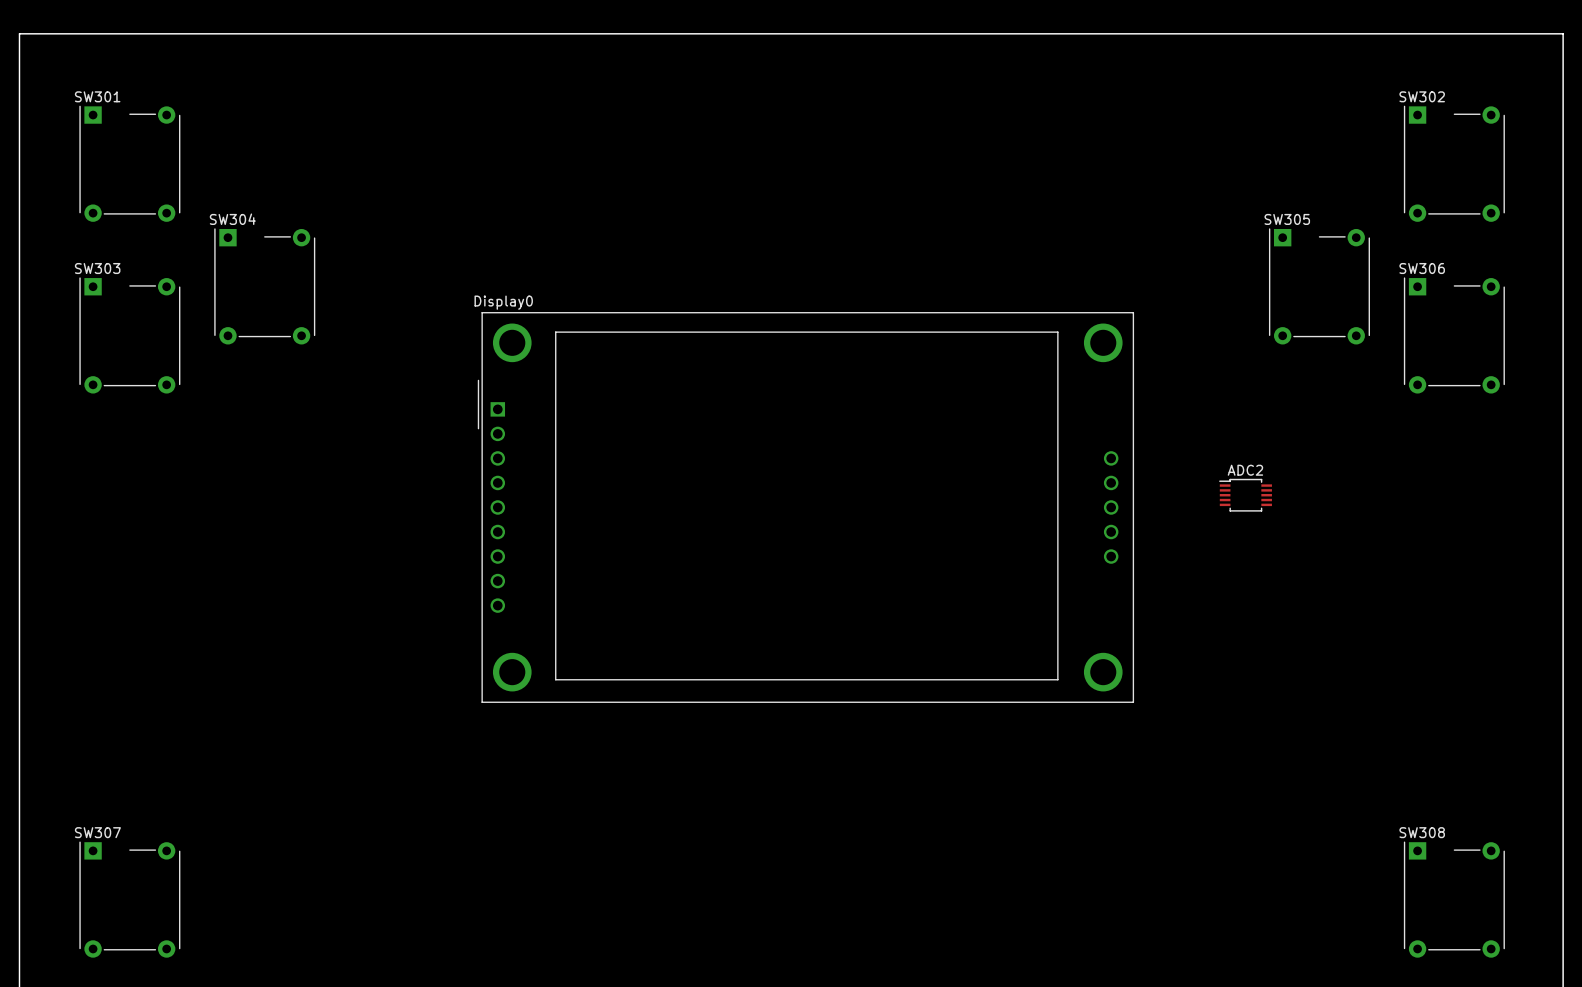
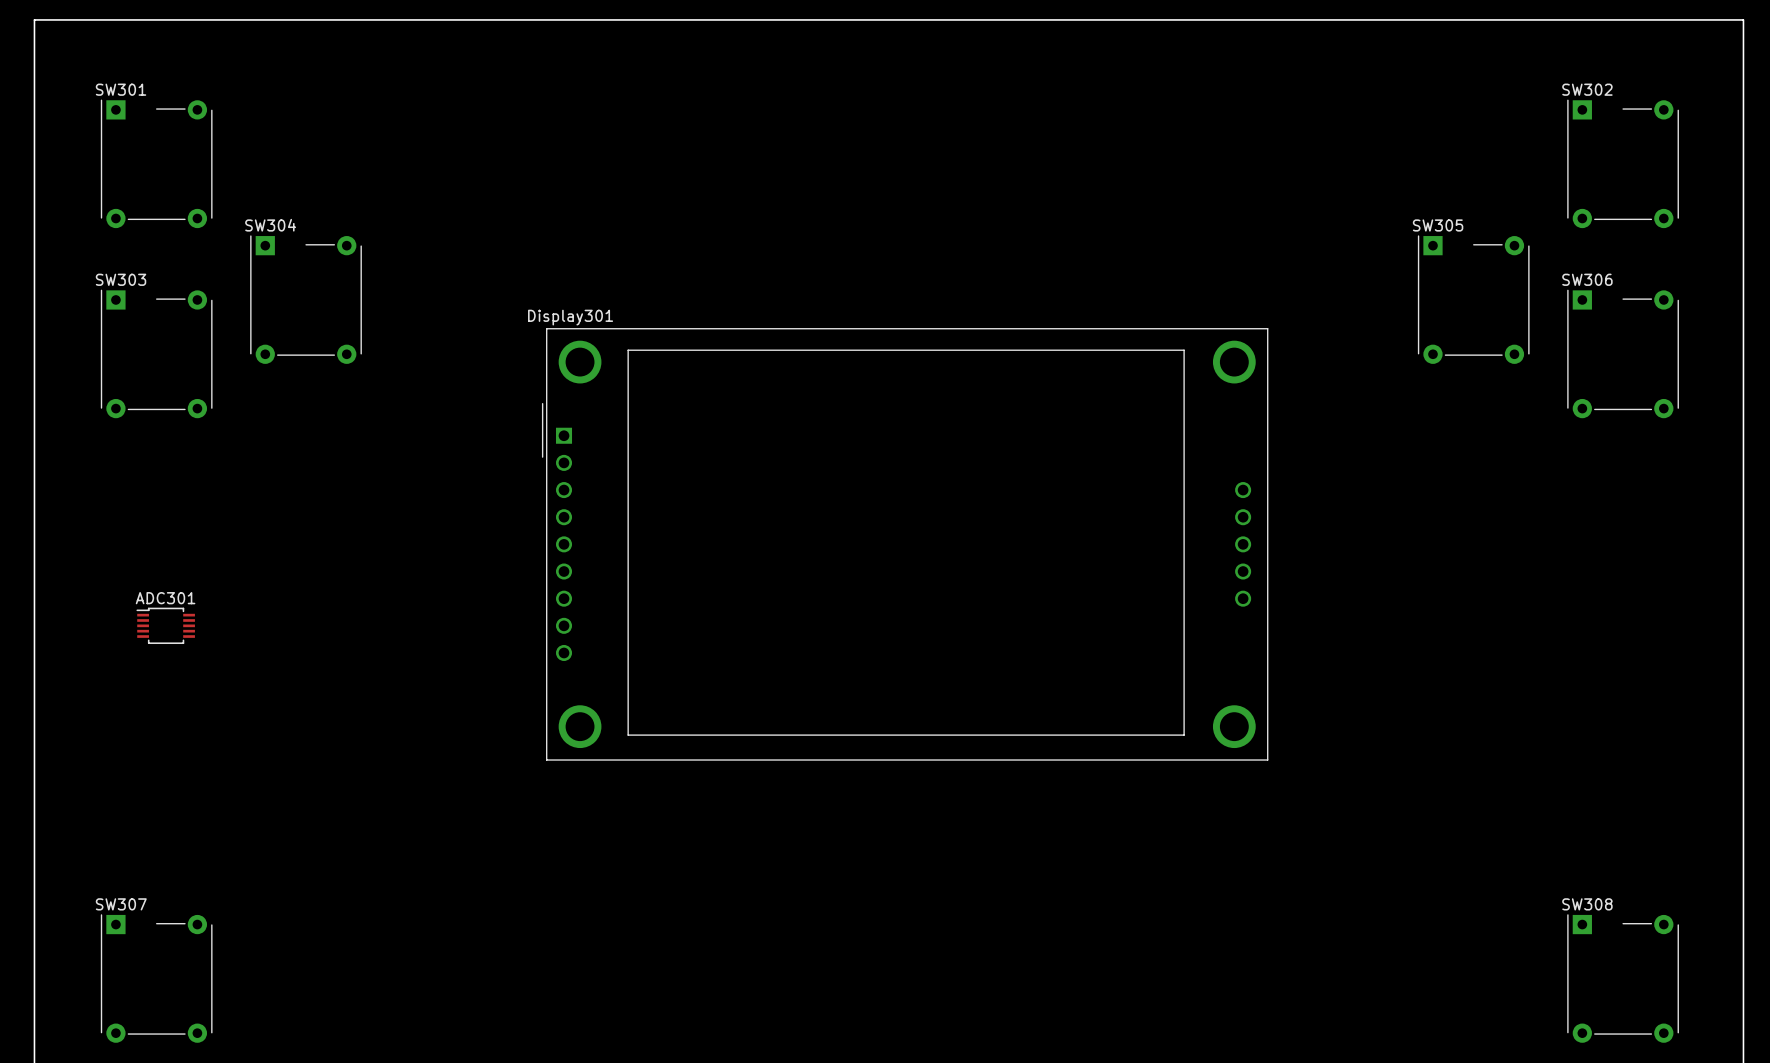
Display0 name: Display0 (503, 302) -> Display301 (570, 317)
ADC2: (1245, 495) -> none
ADC301: none -> (165, 625)

